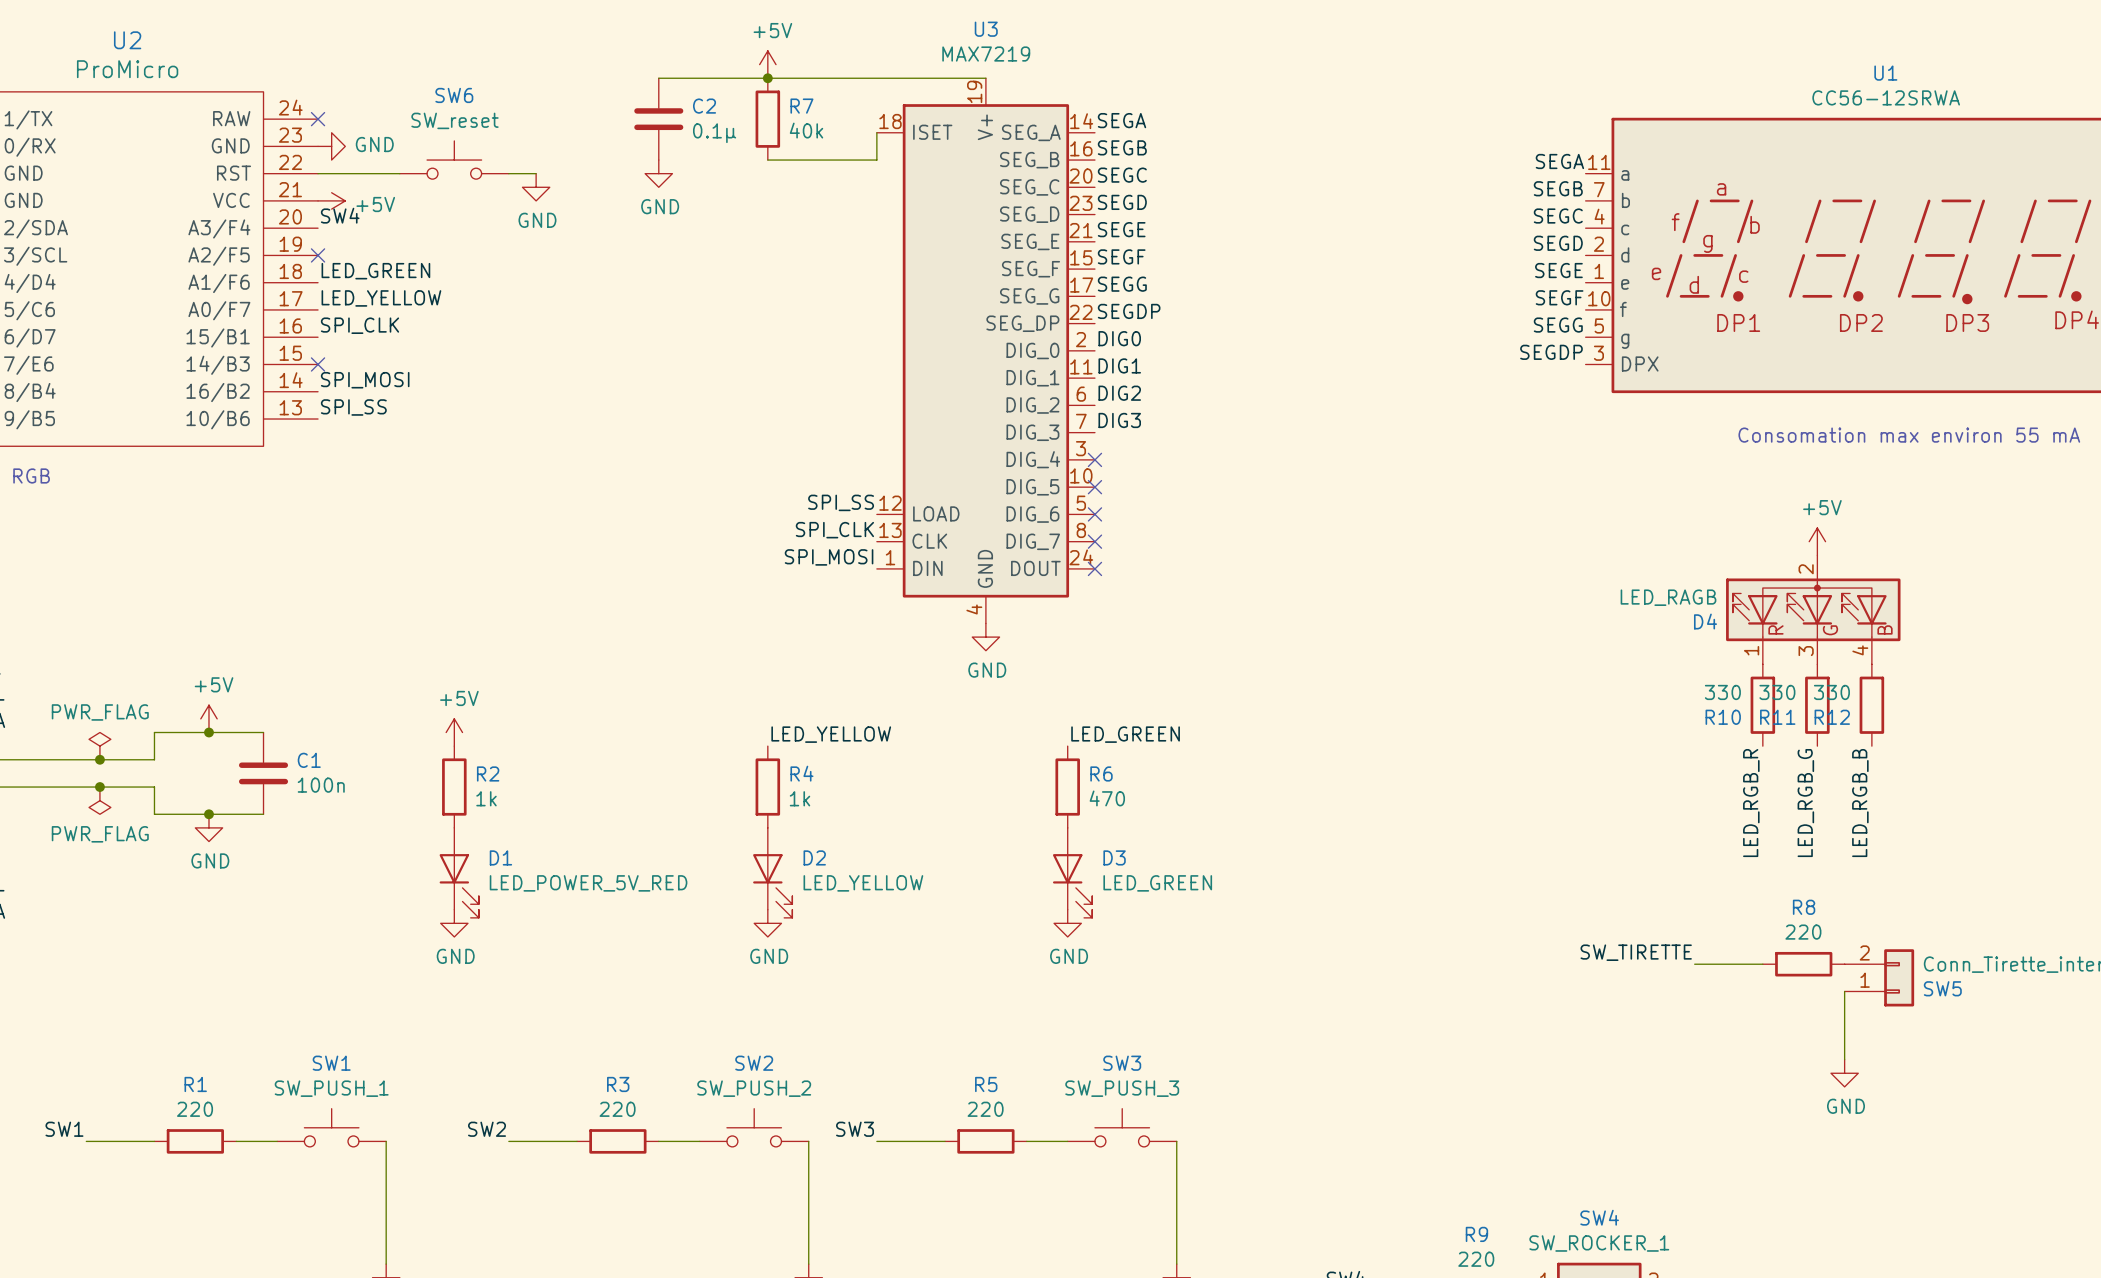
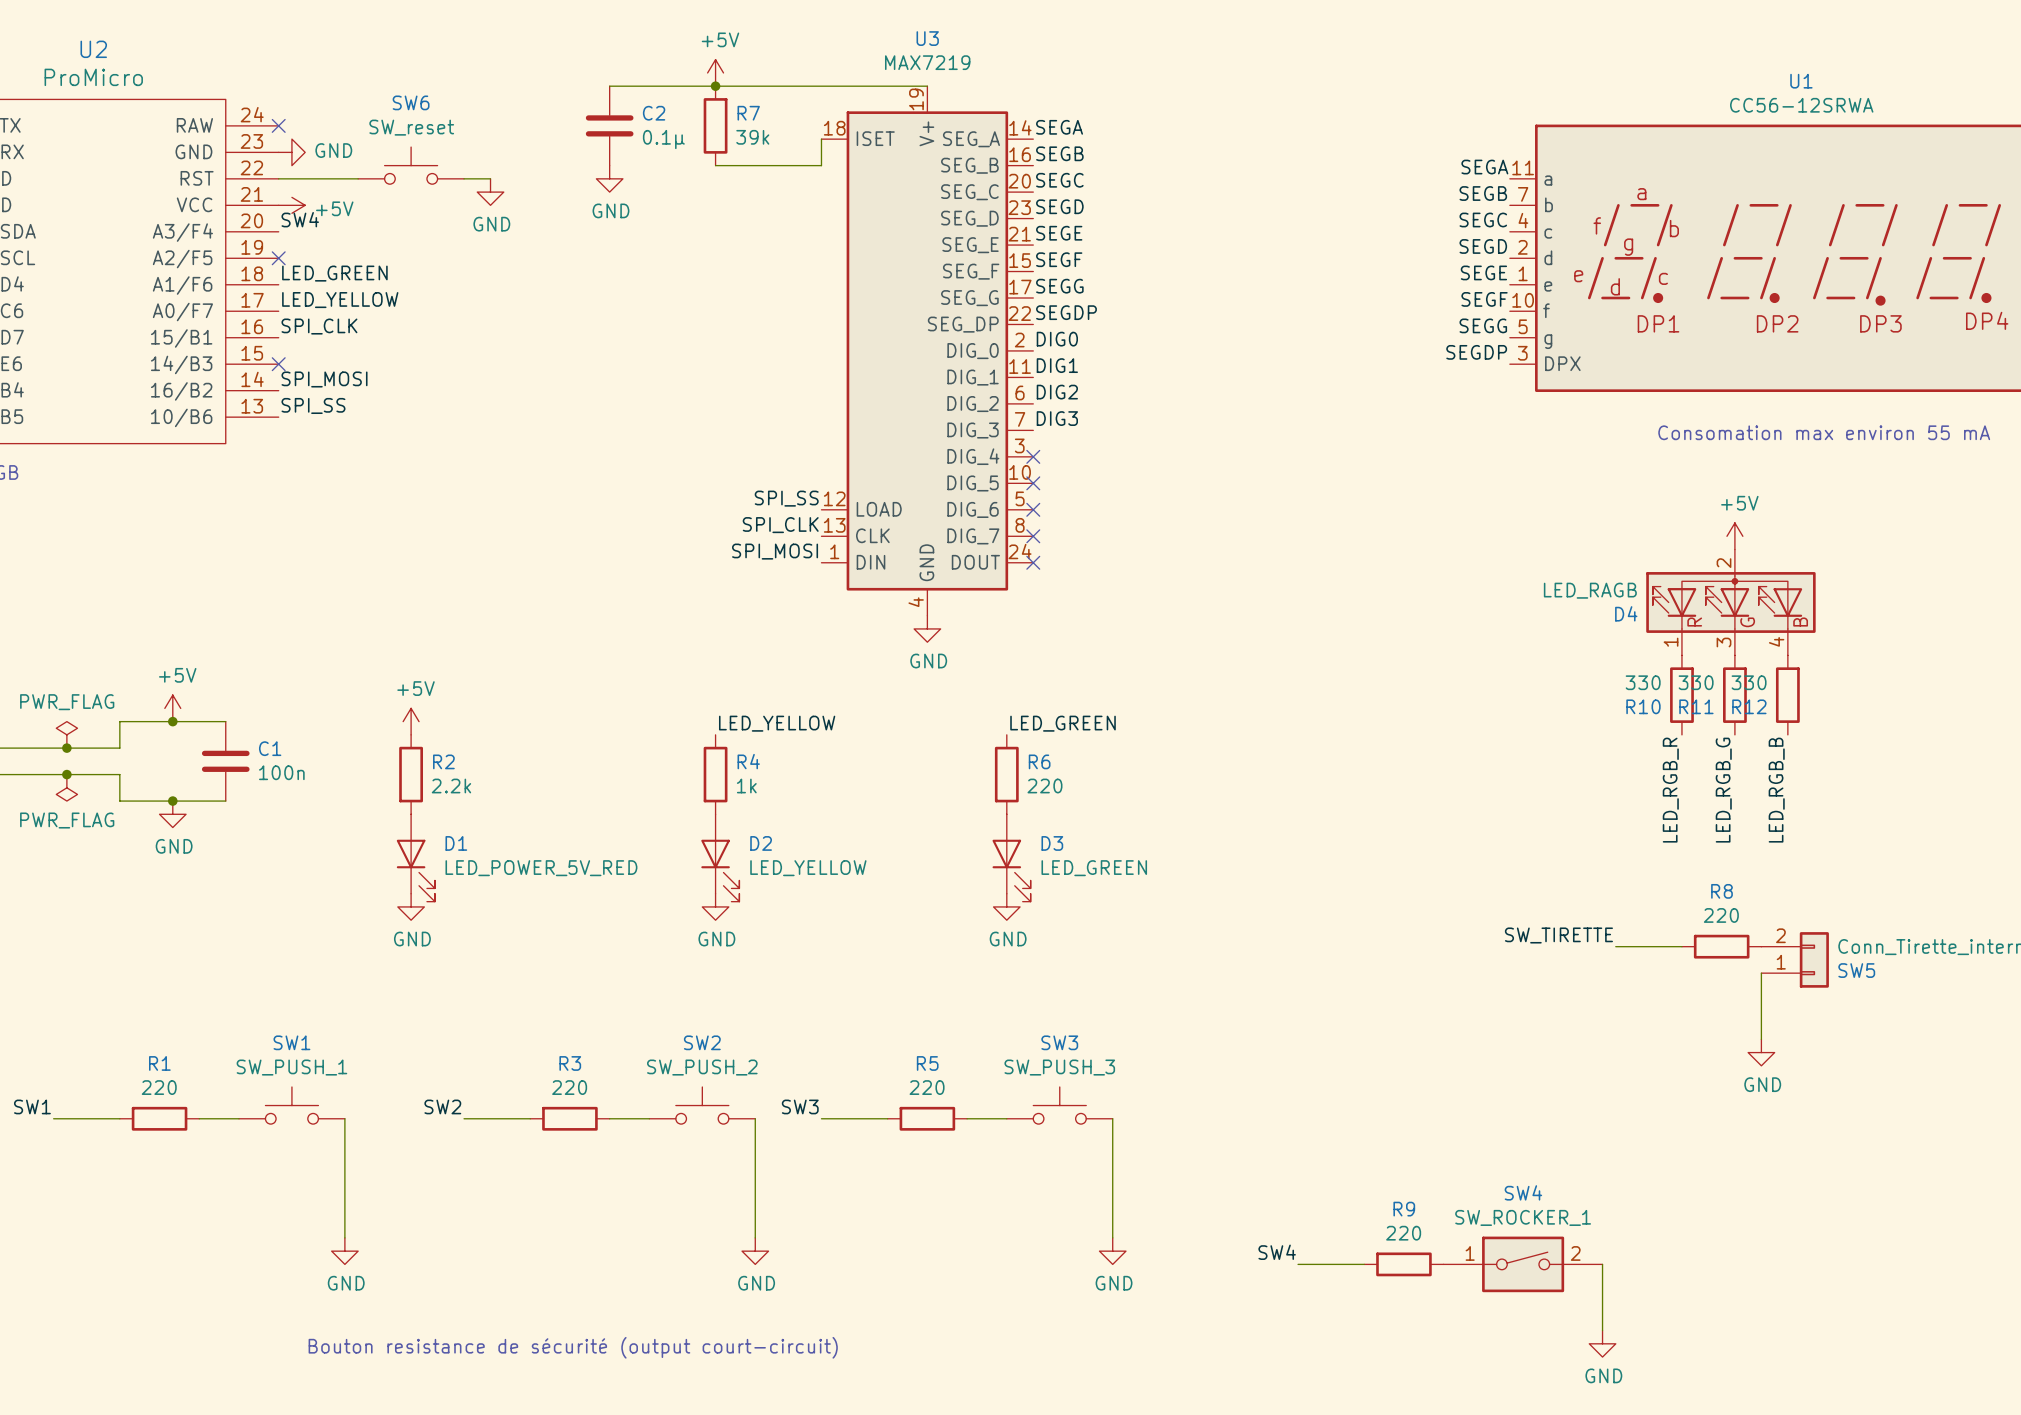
R7 value: 40k (806, 130) -> 39k (752, 137)
R2 value: 1k (486, 798) -> 2.2k (451, 786)
R6 value: 470 (1107, 798) -> 220 (1044, 786)

